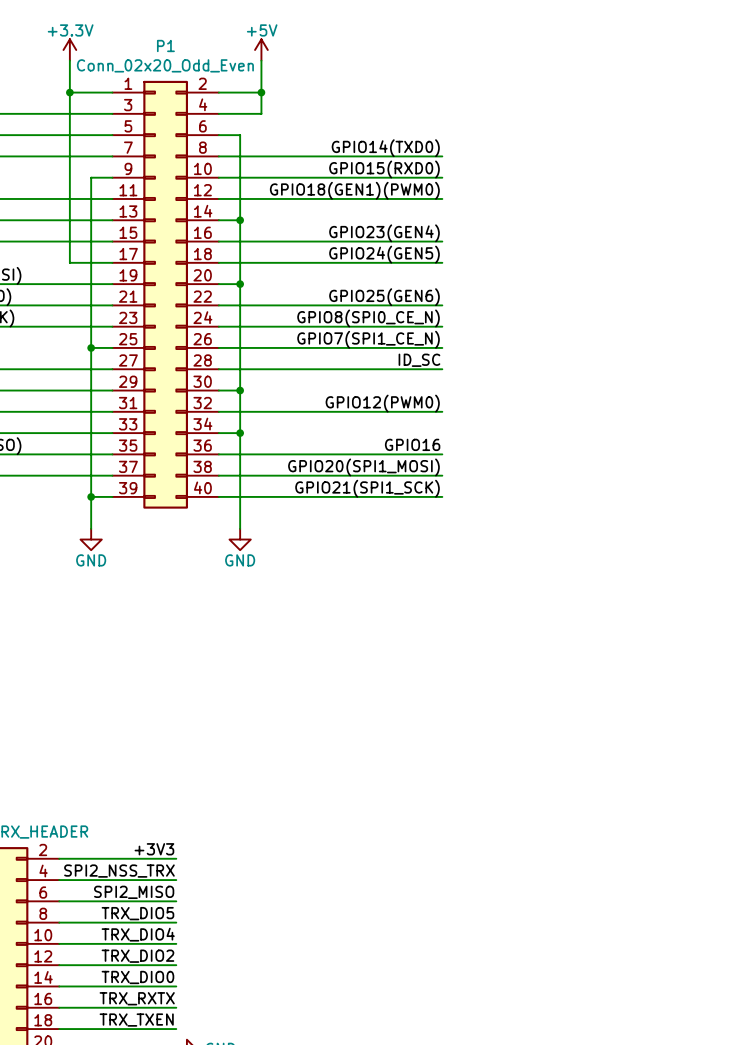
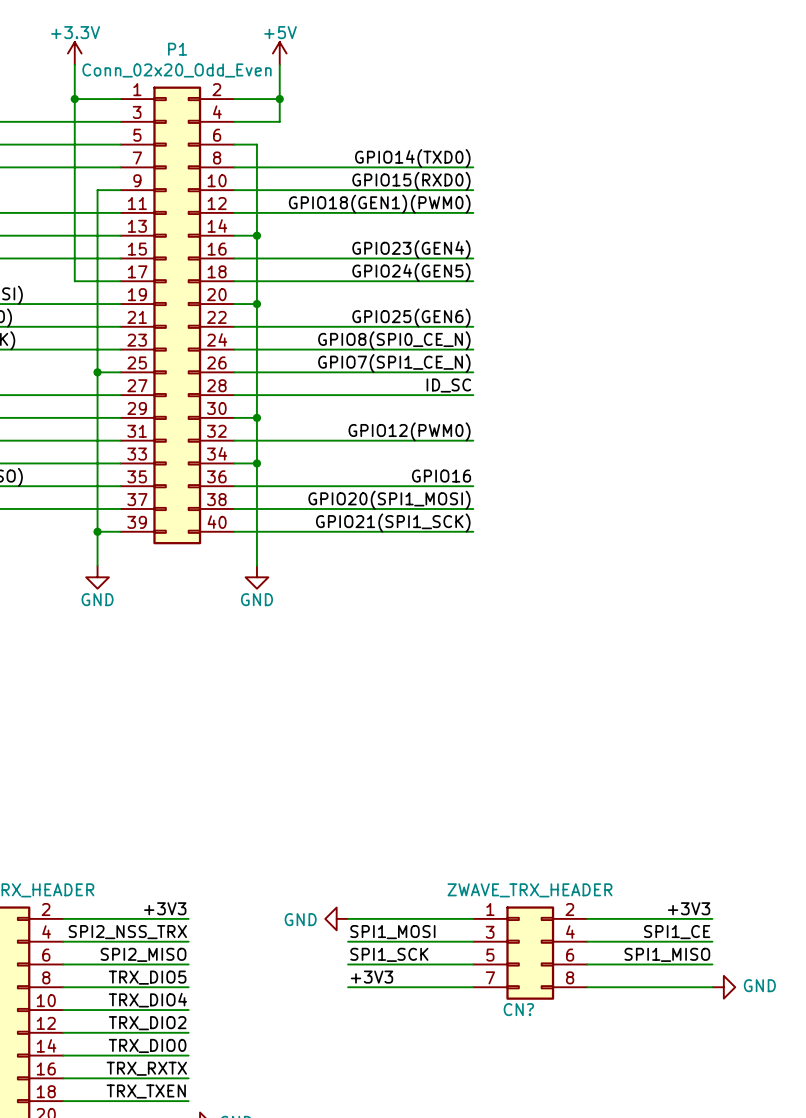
label: none -> +3V3 (689, 908)
power symbol: none -> GND (336, 918)
wire: none -> (348, 918) (473, 918)
wire: none -> (587, 918) (712, 918)
label: none -> SPI1_MOSI (392, 932)
label: none -> SPI1_CE (677, 932)
wire: none -> (348, 941) (473, 941)
wire: none -> (587, 941) (712, 941)
CN?: none -> ZWAVE_TRX_HEADER (530, 953)
label: none -> SPI1_SCK (389, 954)
label: none -> SPI1_MISO (667, 954)
wire: none -> (348, 964) (473, 964)
wire: none -> (587, 964) (712, 964)
label: none -> +3V3 (372, 977)
wire: none -> (348, 987) (473, 987)
wire: none -> (587, 987) (712, 987)
power symbol: none -> GND (723, 987)

